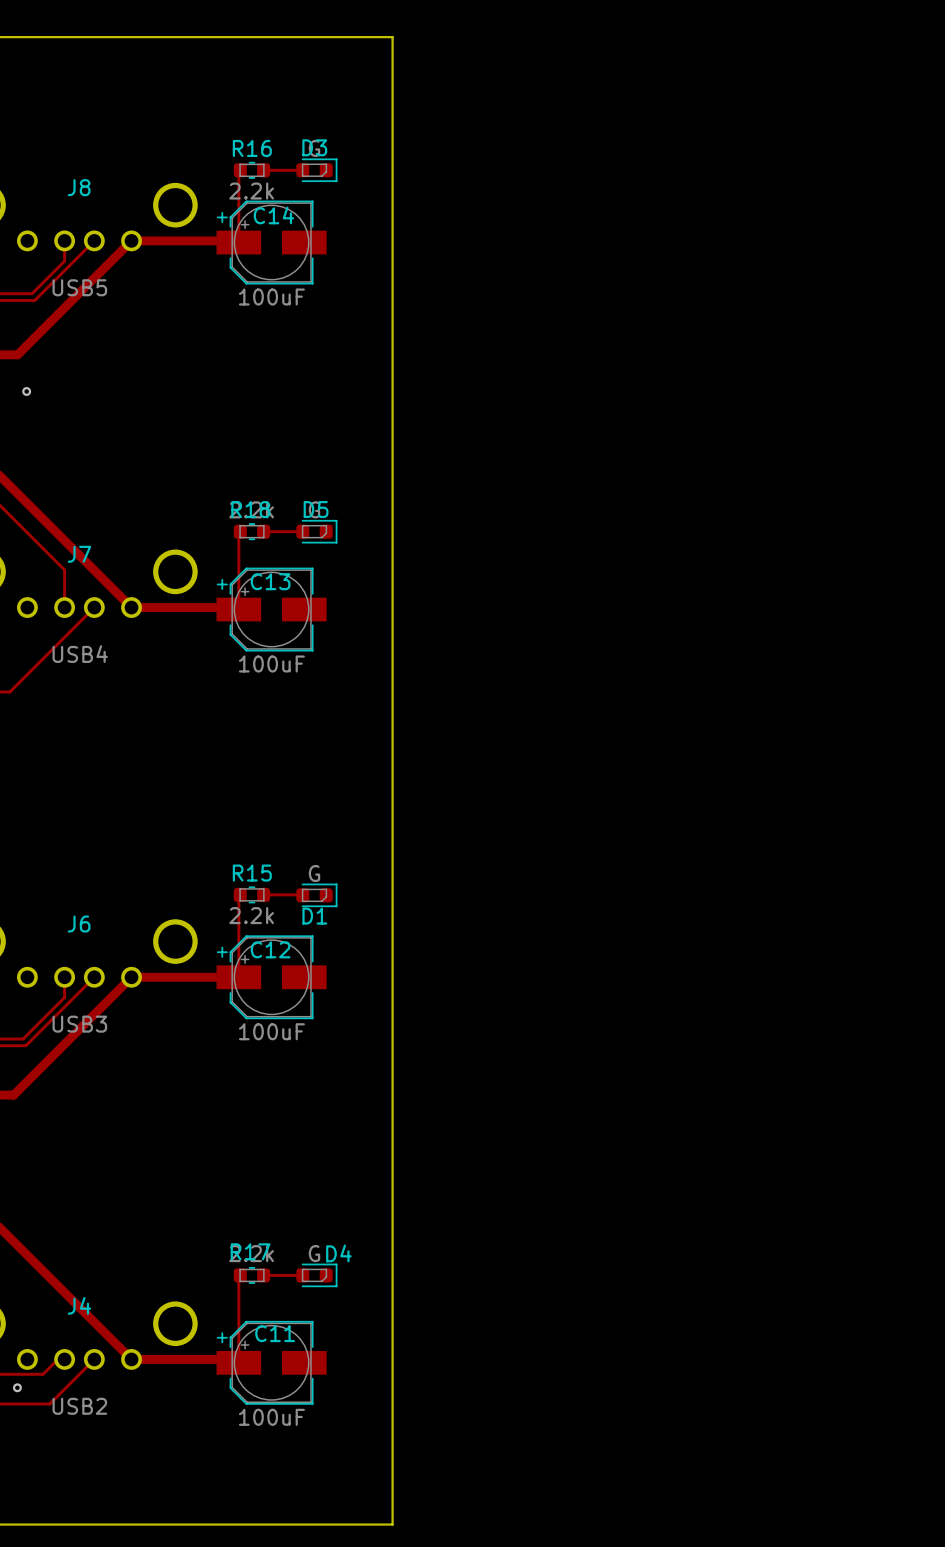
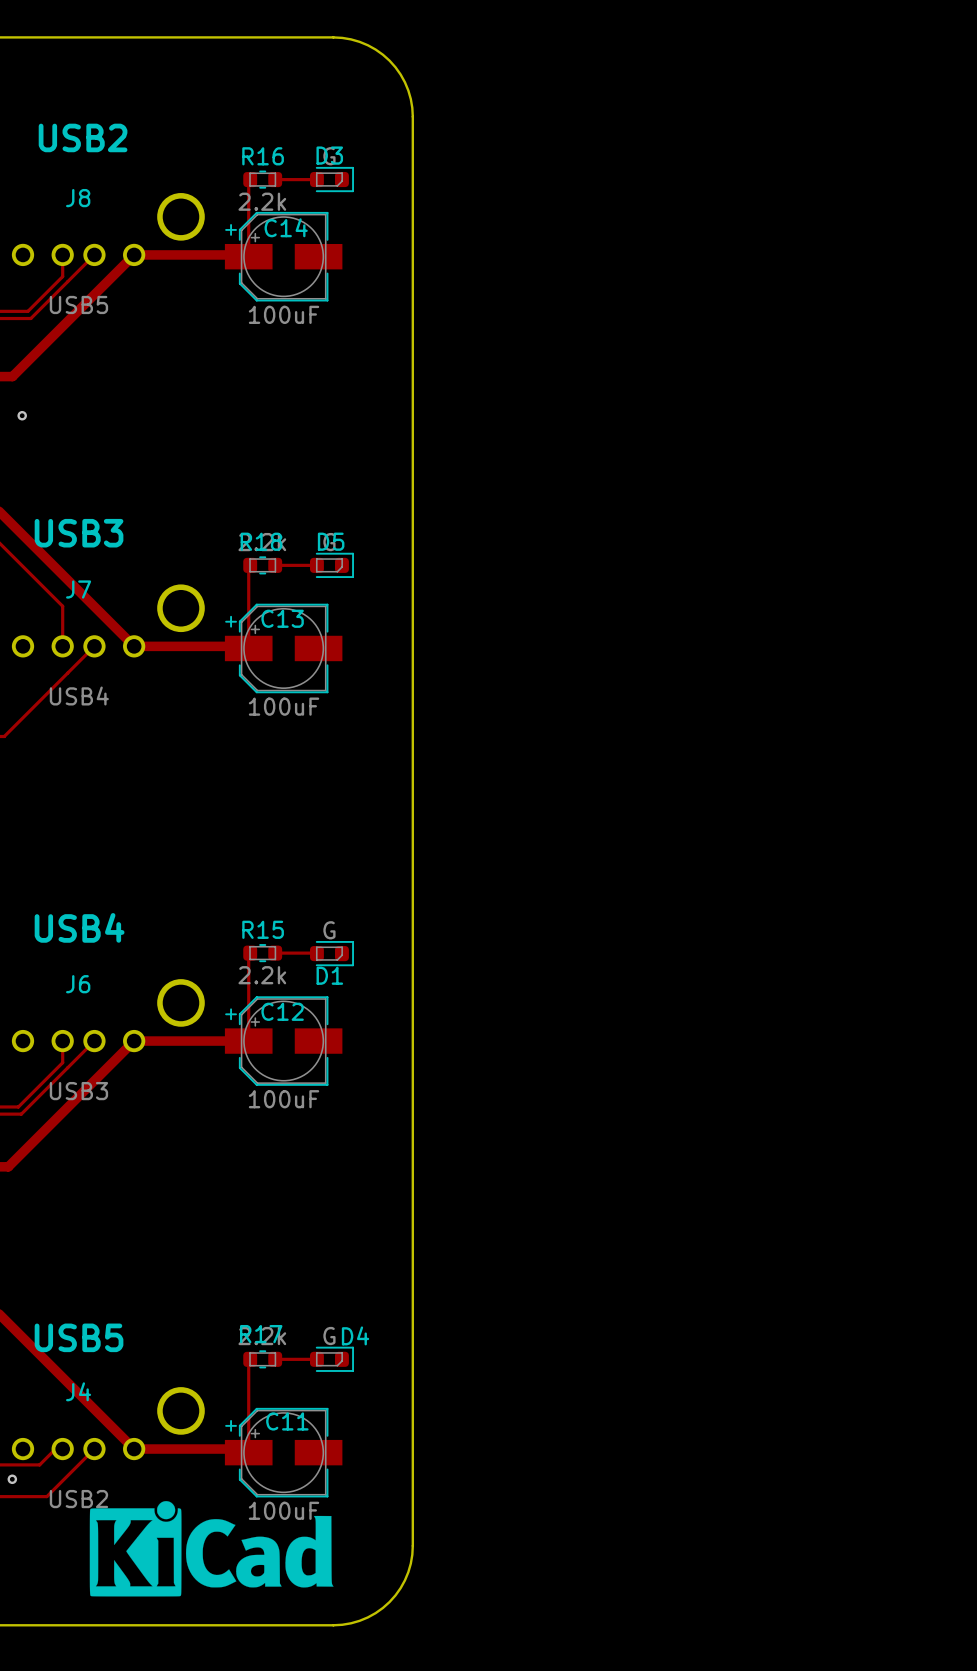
board edge: (318, 37) (392, 37) (392, 111) -> (333, 37) (359, 41) (375, 49) (389, 60) (400, 74) (408, 90) (412, 116)
text: none -> USB2 (83, 137)
text: none -> USB3 (79, 533)
text: none -> USB4 (79, 927)
text: none -> USB5 (79, 1337)
drawing: none -> [89, 1501, 334, 1597]
board edge: (392, 1450) (392, 1524) (318, 1524) -> (412, 1545) (408, 1572) (400, 1588) (389, 1602) (375, 1613) (359, 1620) (333, 1625)

